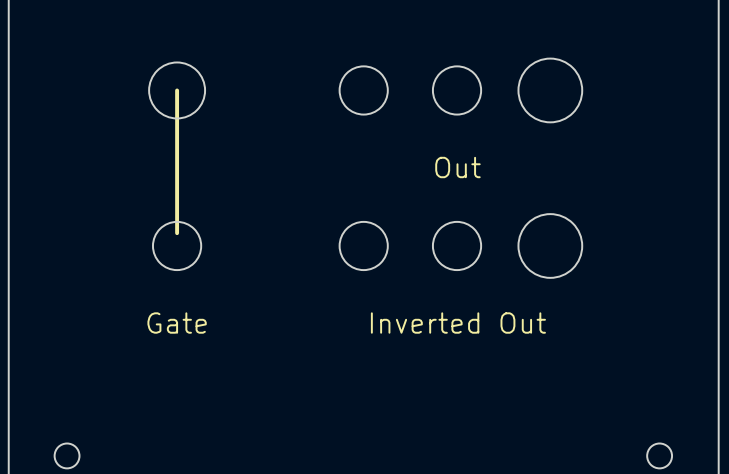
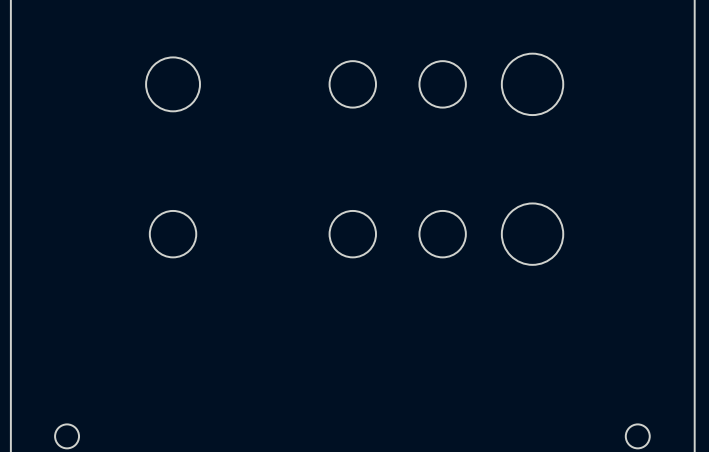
line: (177, 90) (177, 233) -> none
text: Out (457, 167) -> none
text: Gate (177, 323) -> none
text: Inverted Out (458, 323) -> none

